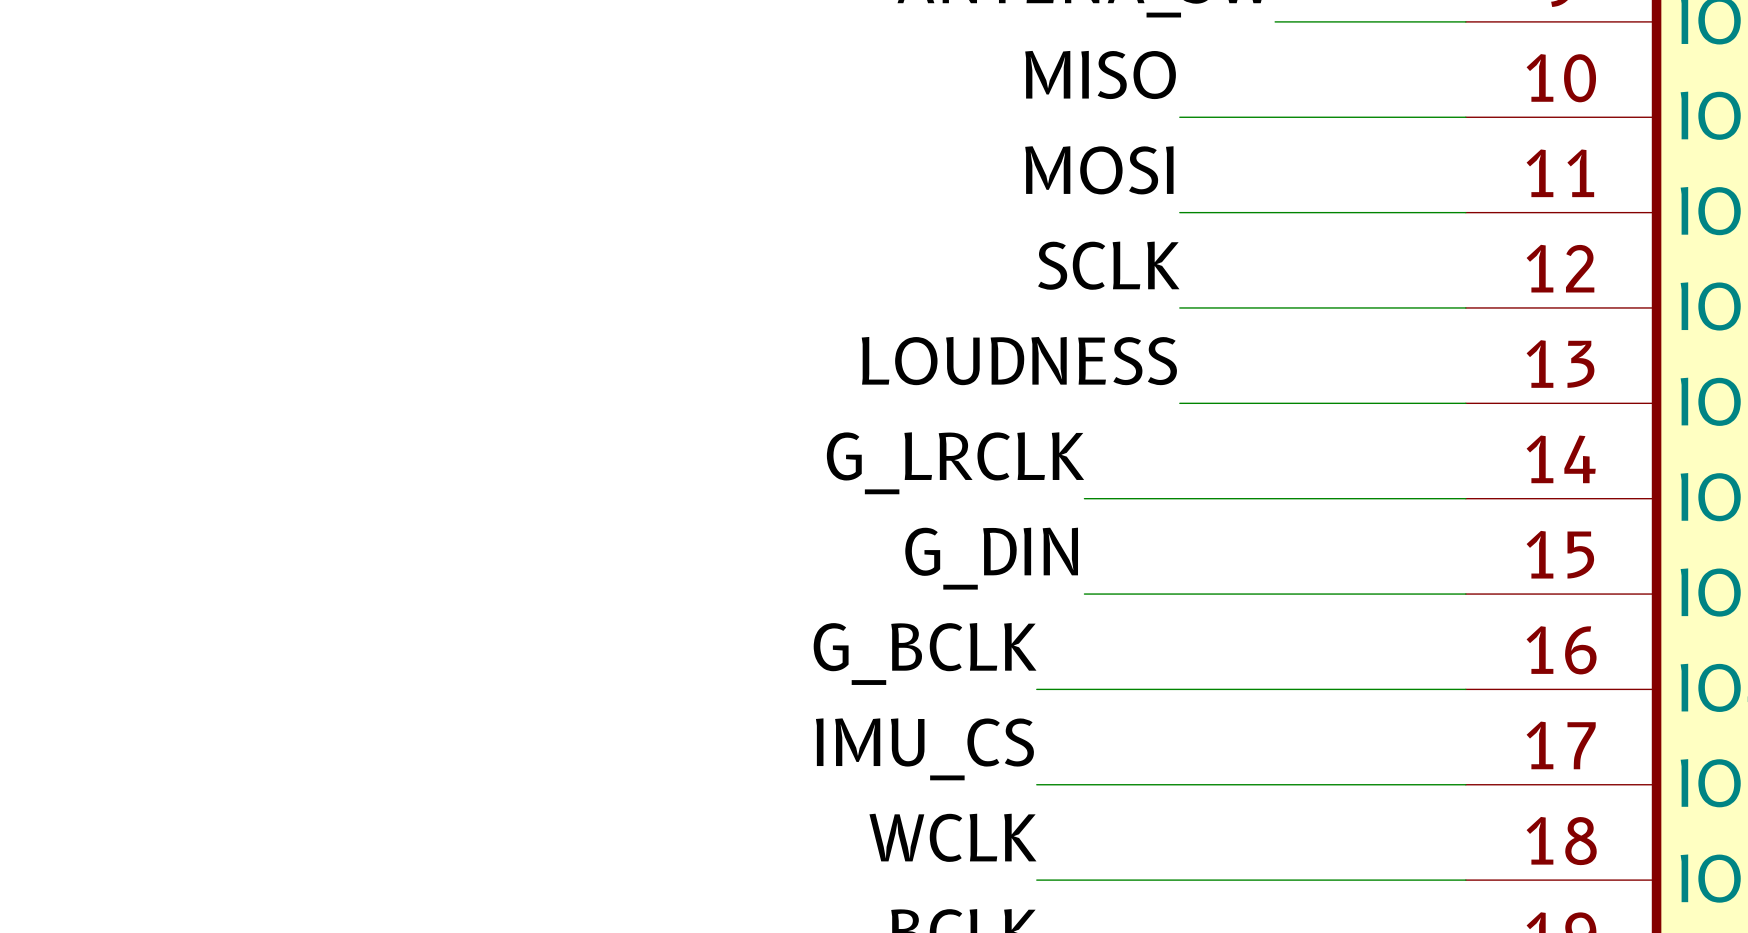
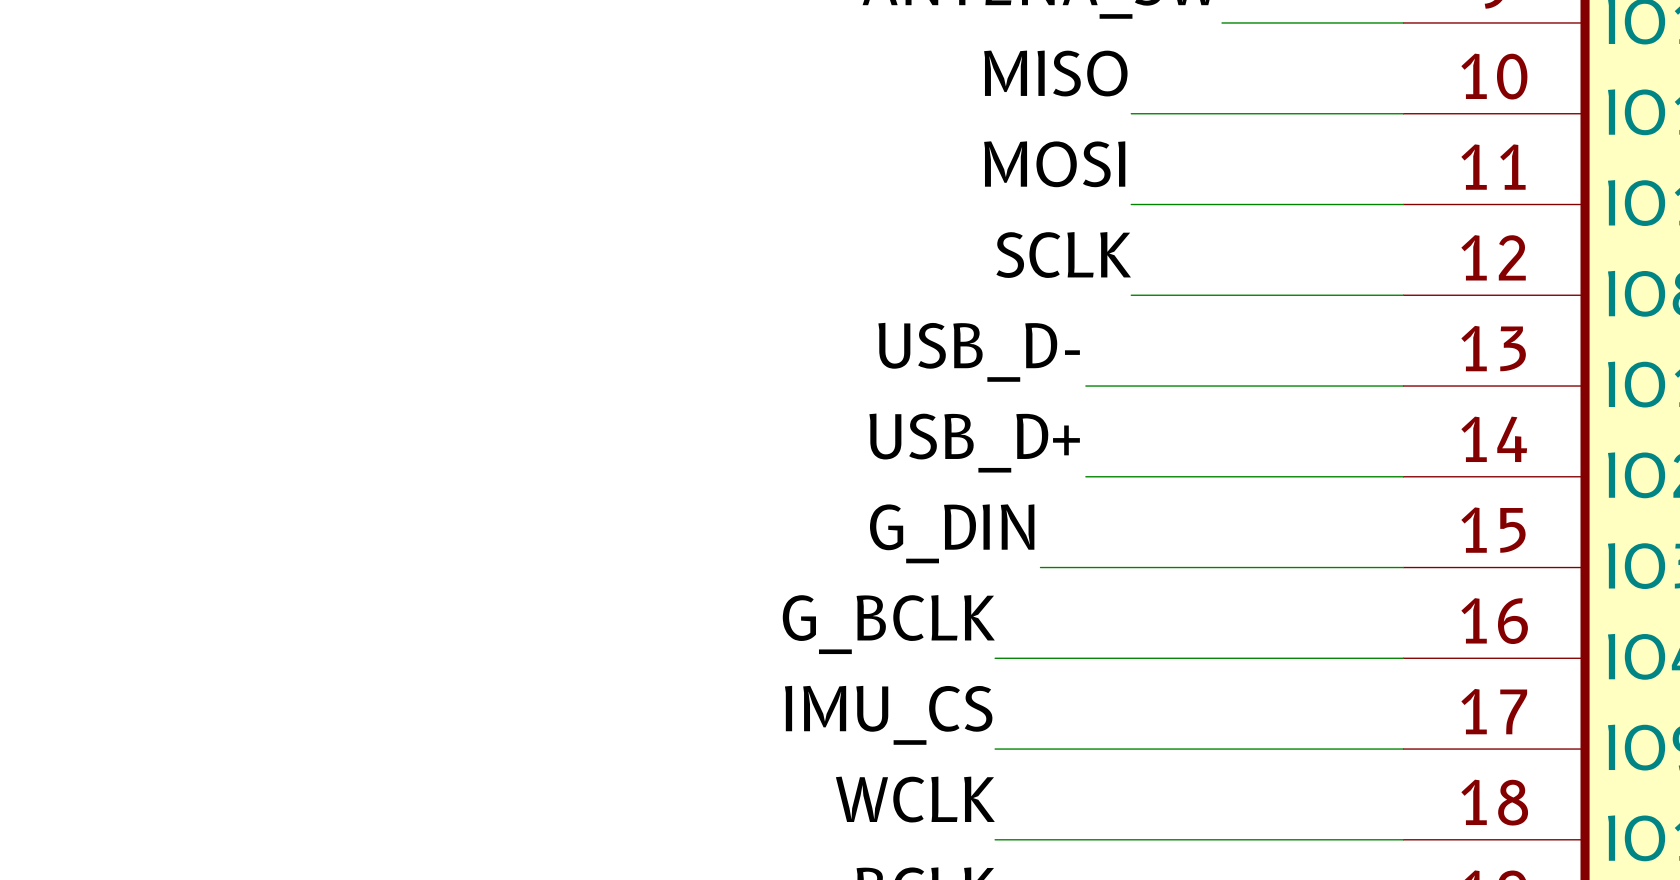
label: LOUDNESS (1019, 361) -> none
label: none -> USB_D- (979, 352)
label: G_LRCLK (955, 463) -> none
label: none -> USB_D+ (974, 443)
wire: (1084, 498) (1132, 498) -> (1085, 386) (1131, 386)

